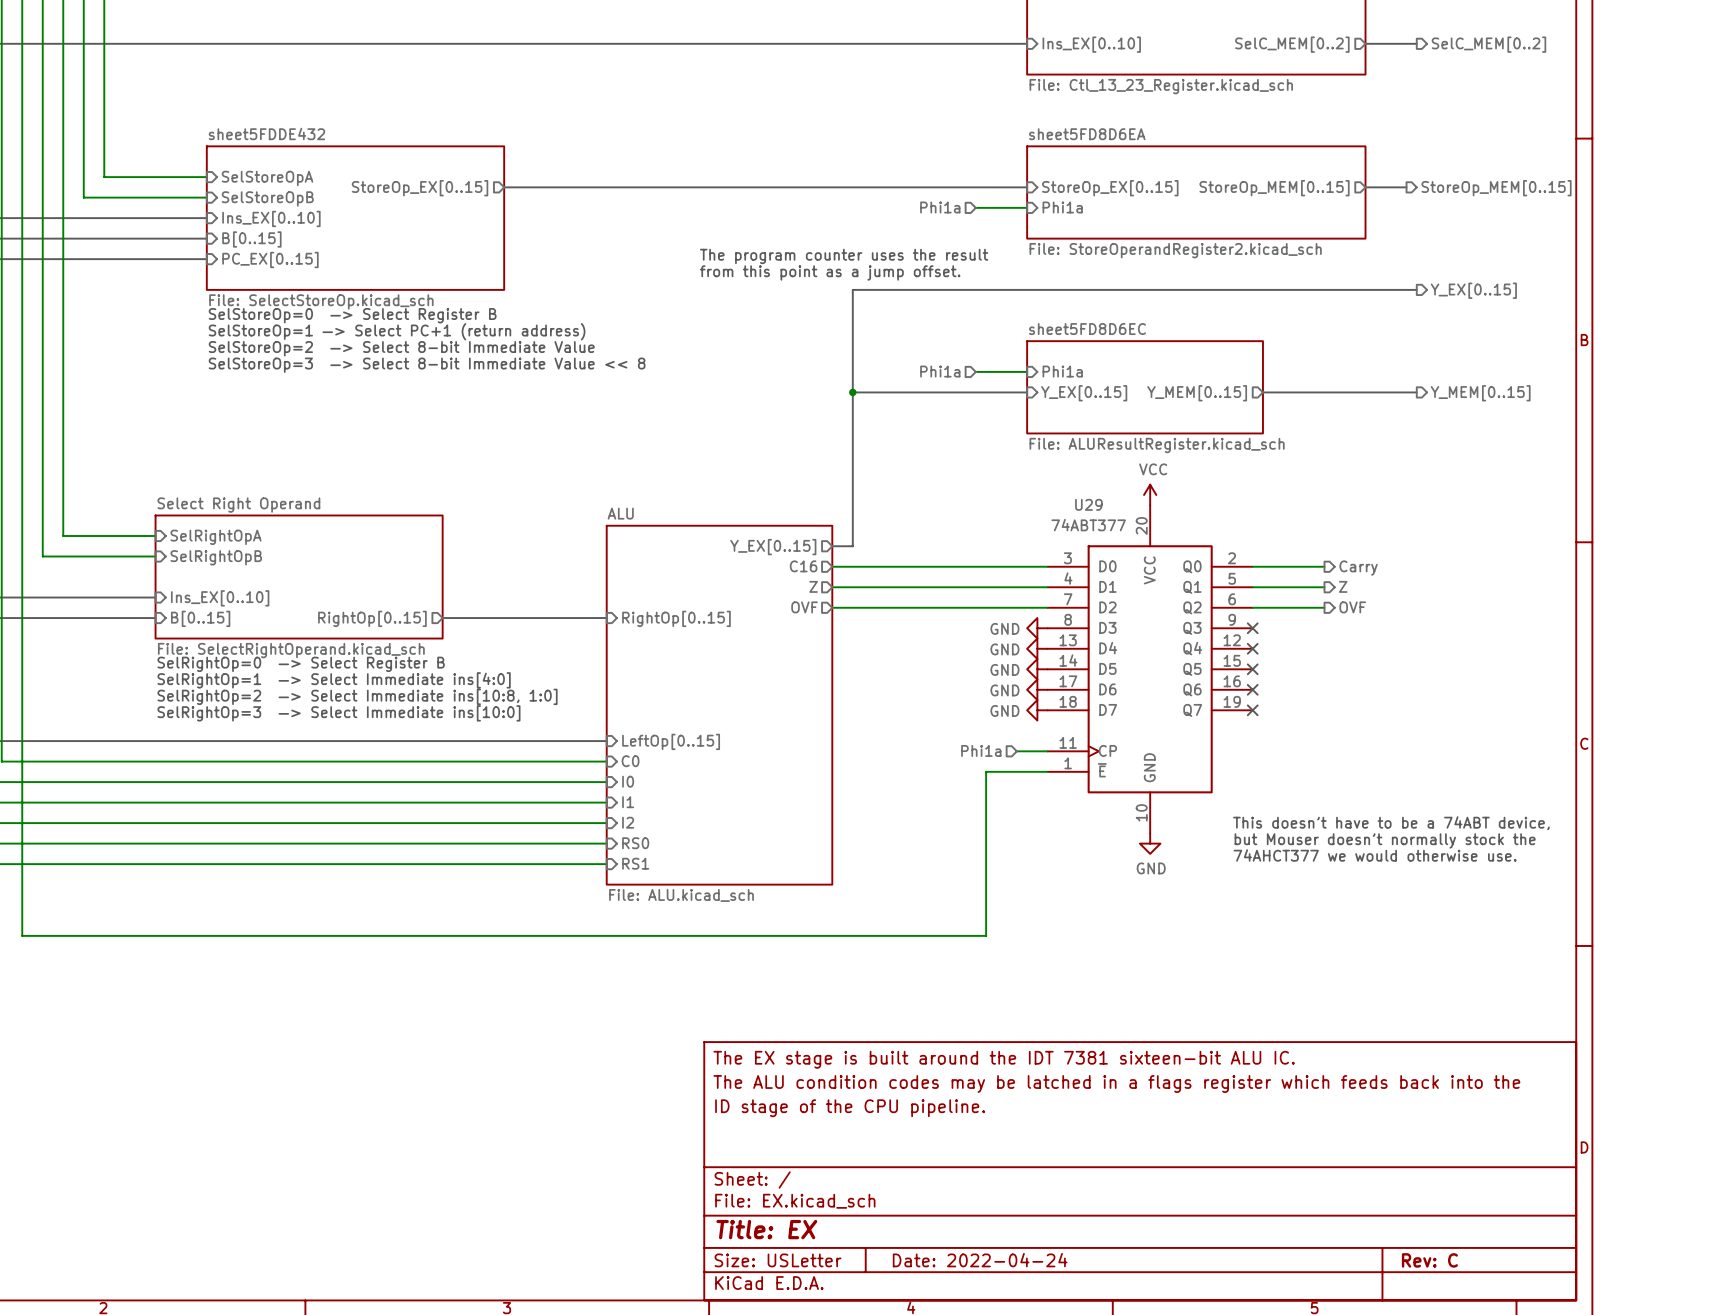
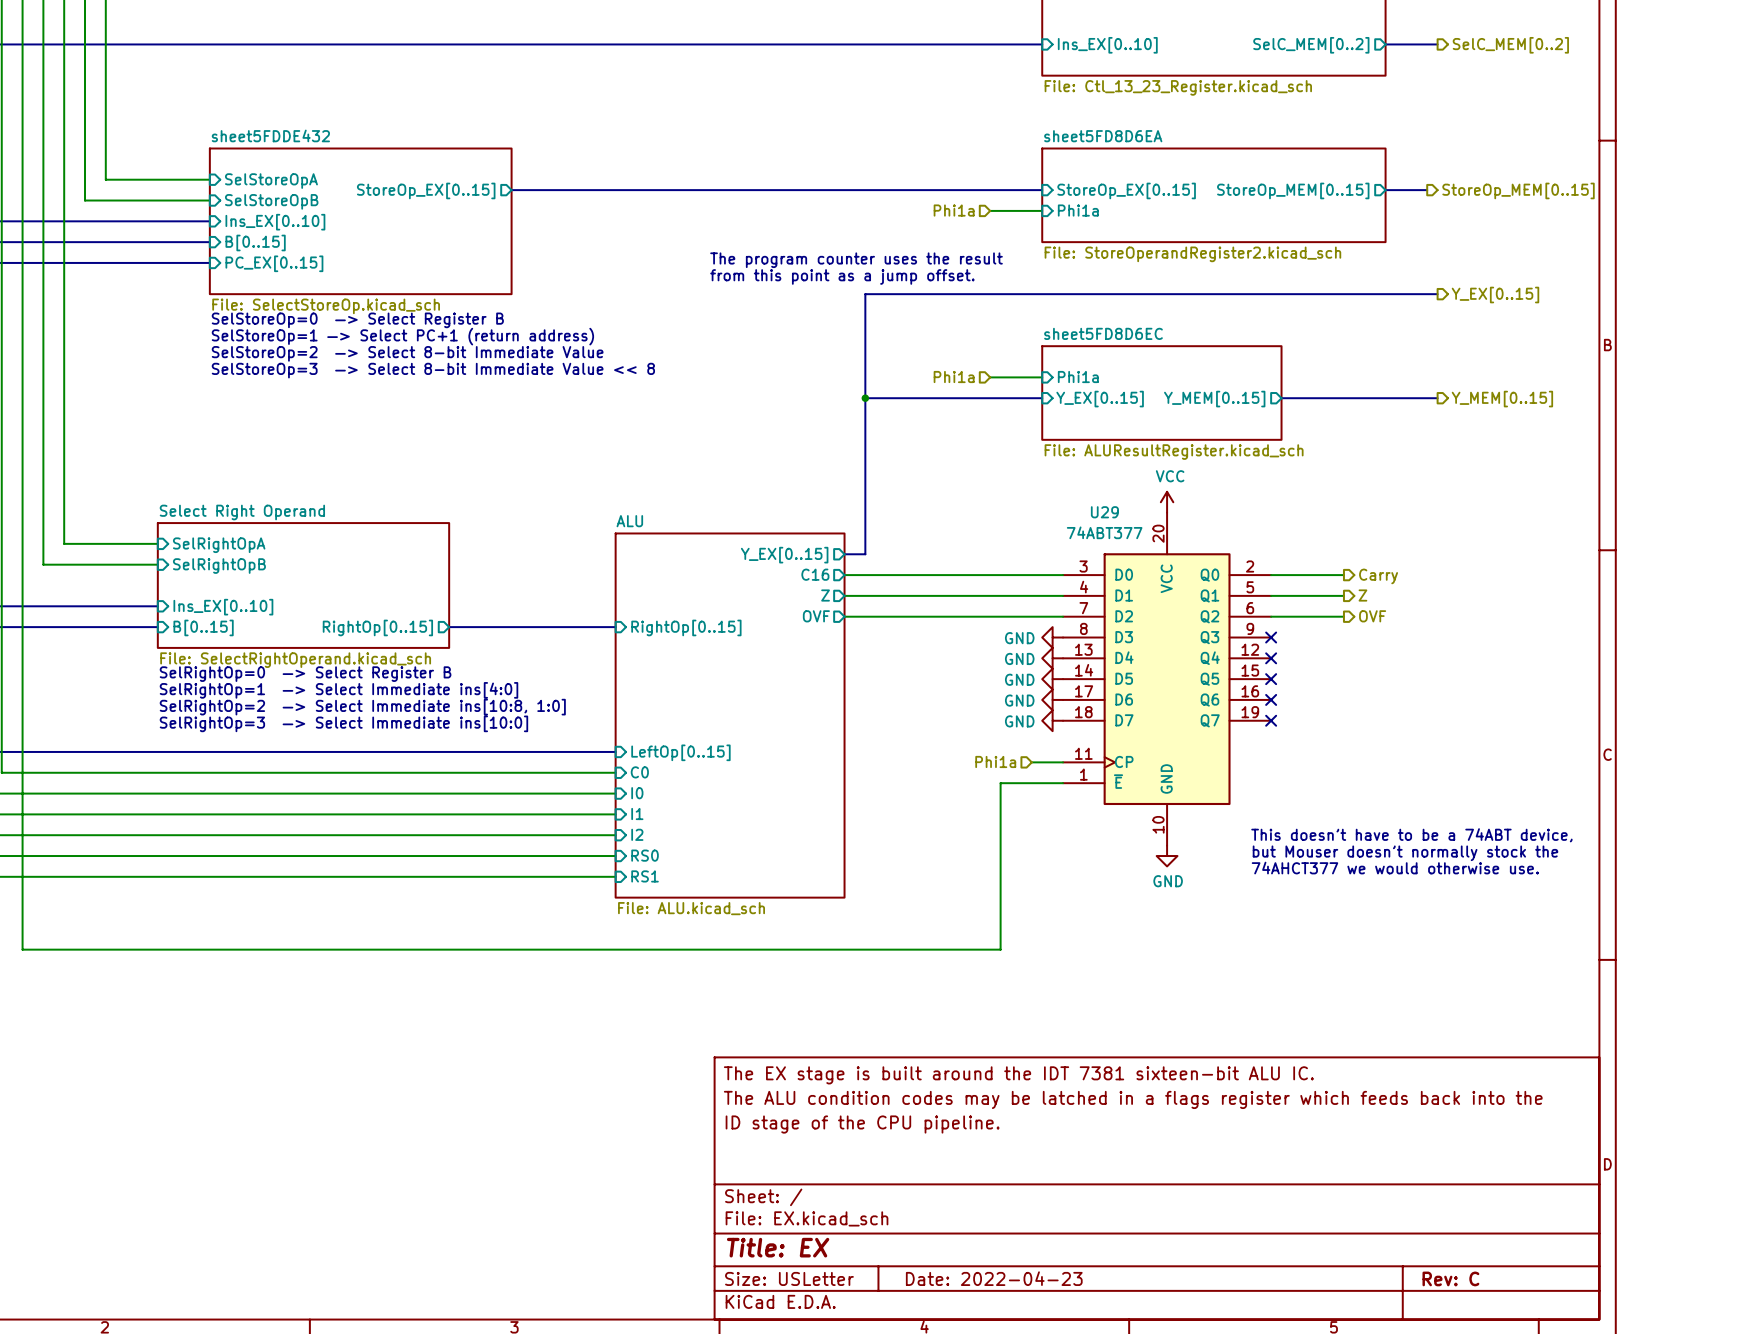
title block: Date: 2022-04-24 (980, 1260) -> Date: 2022-04-23 (994, 1278)

